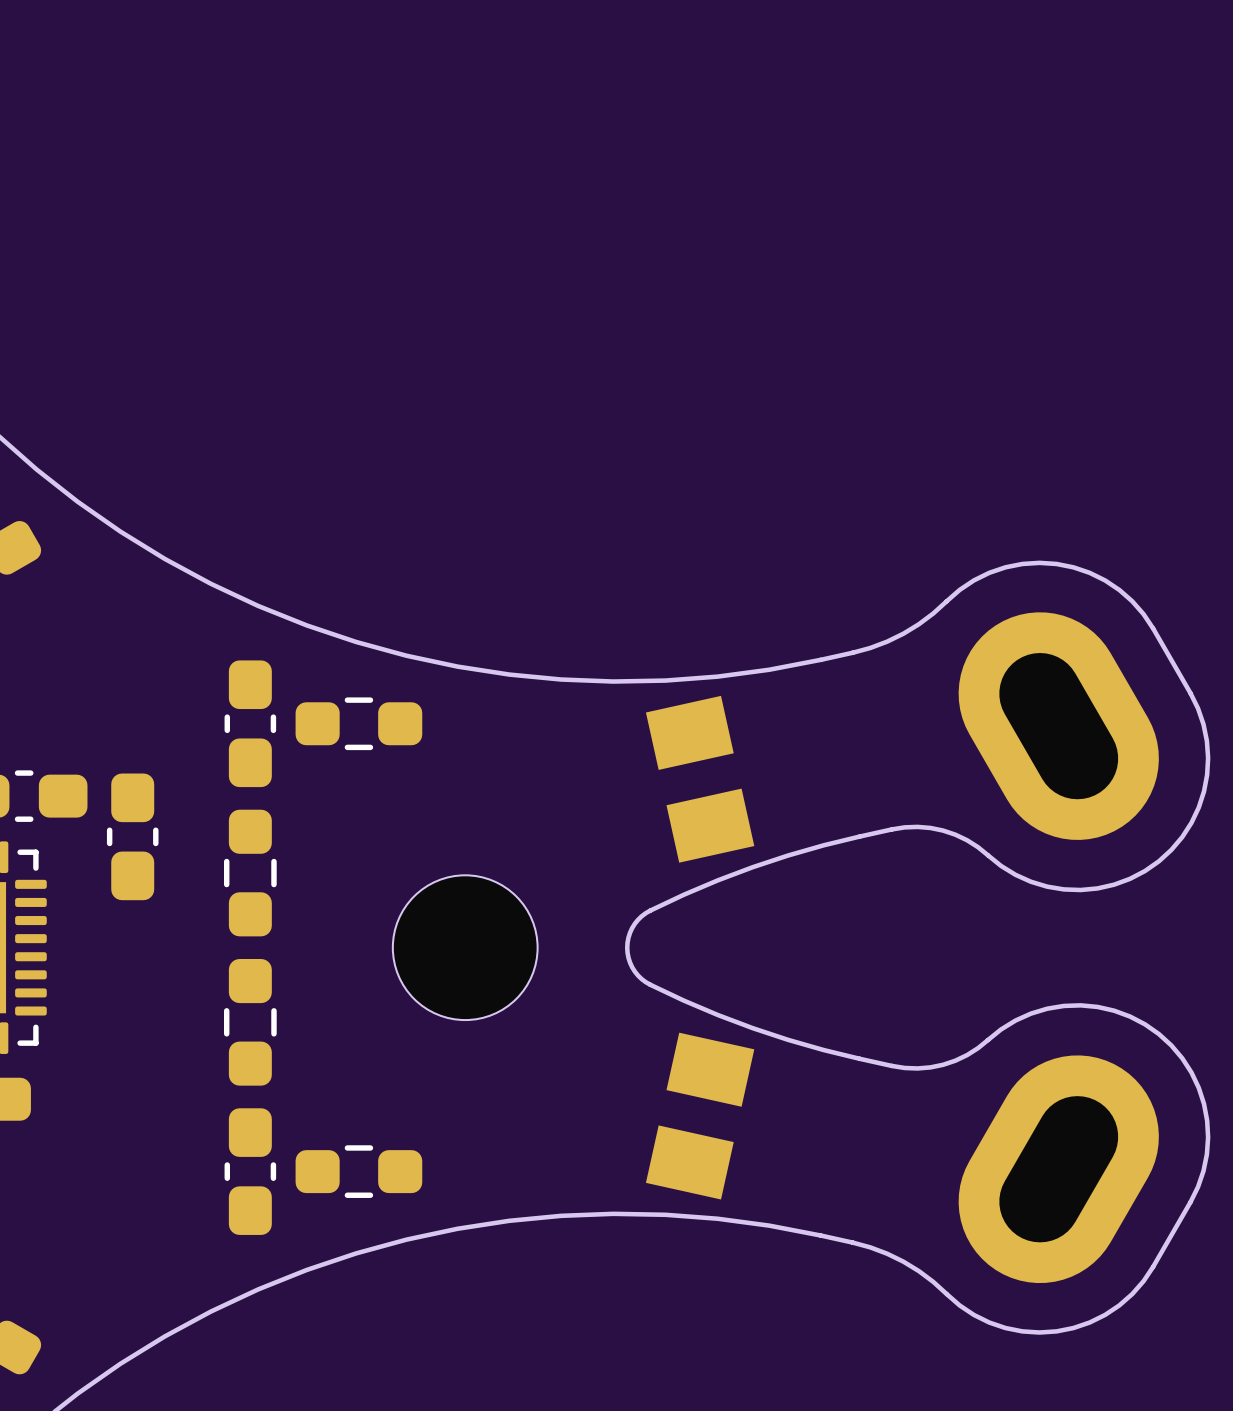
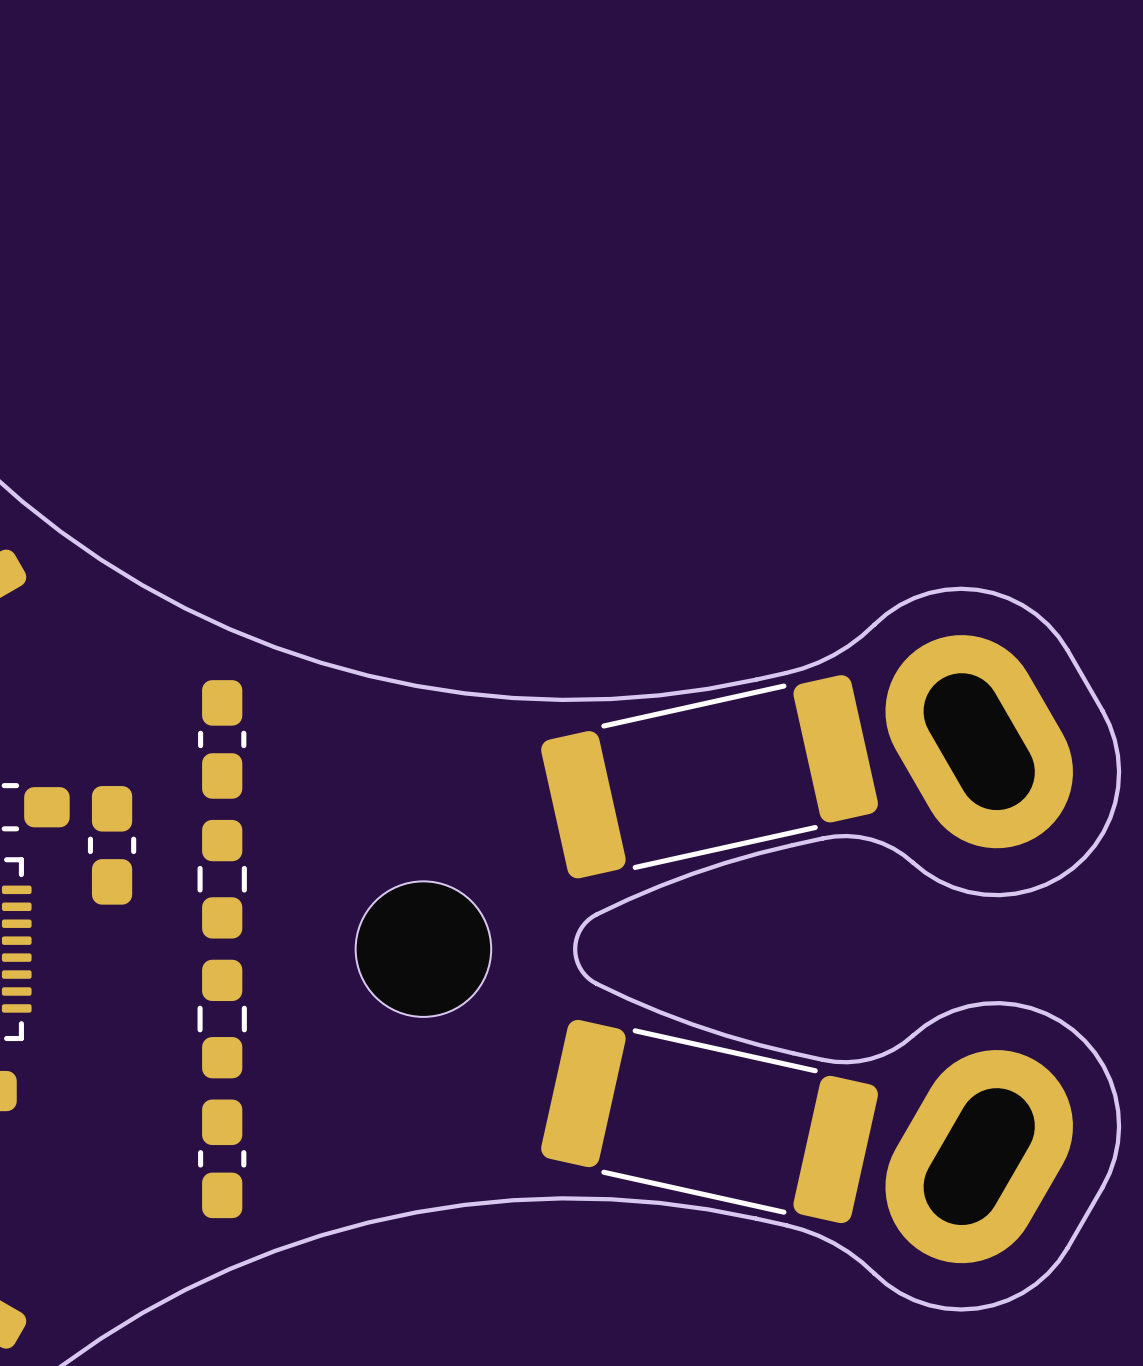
part: (358, 723) -> none
part: none -> (709, 776)
part: (700, 779) -> none
part: (700, 1116) -> none
part: none -> (709, 1121)
part: (358, 1171) -> none

